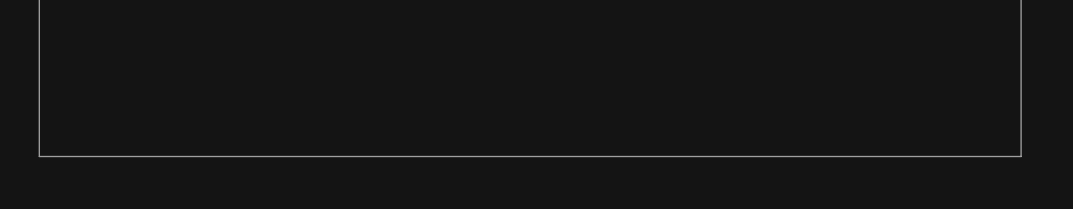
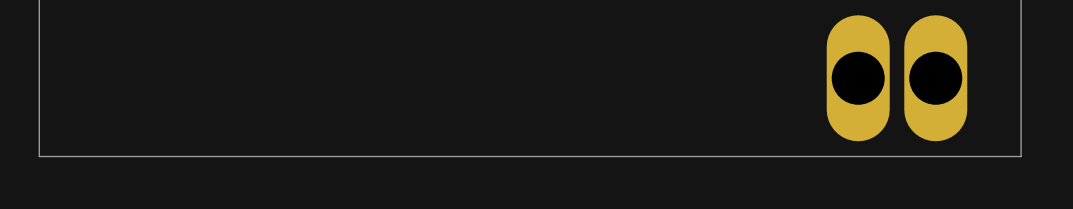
part: none -> (896, 78)

